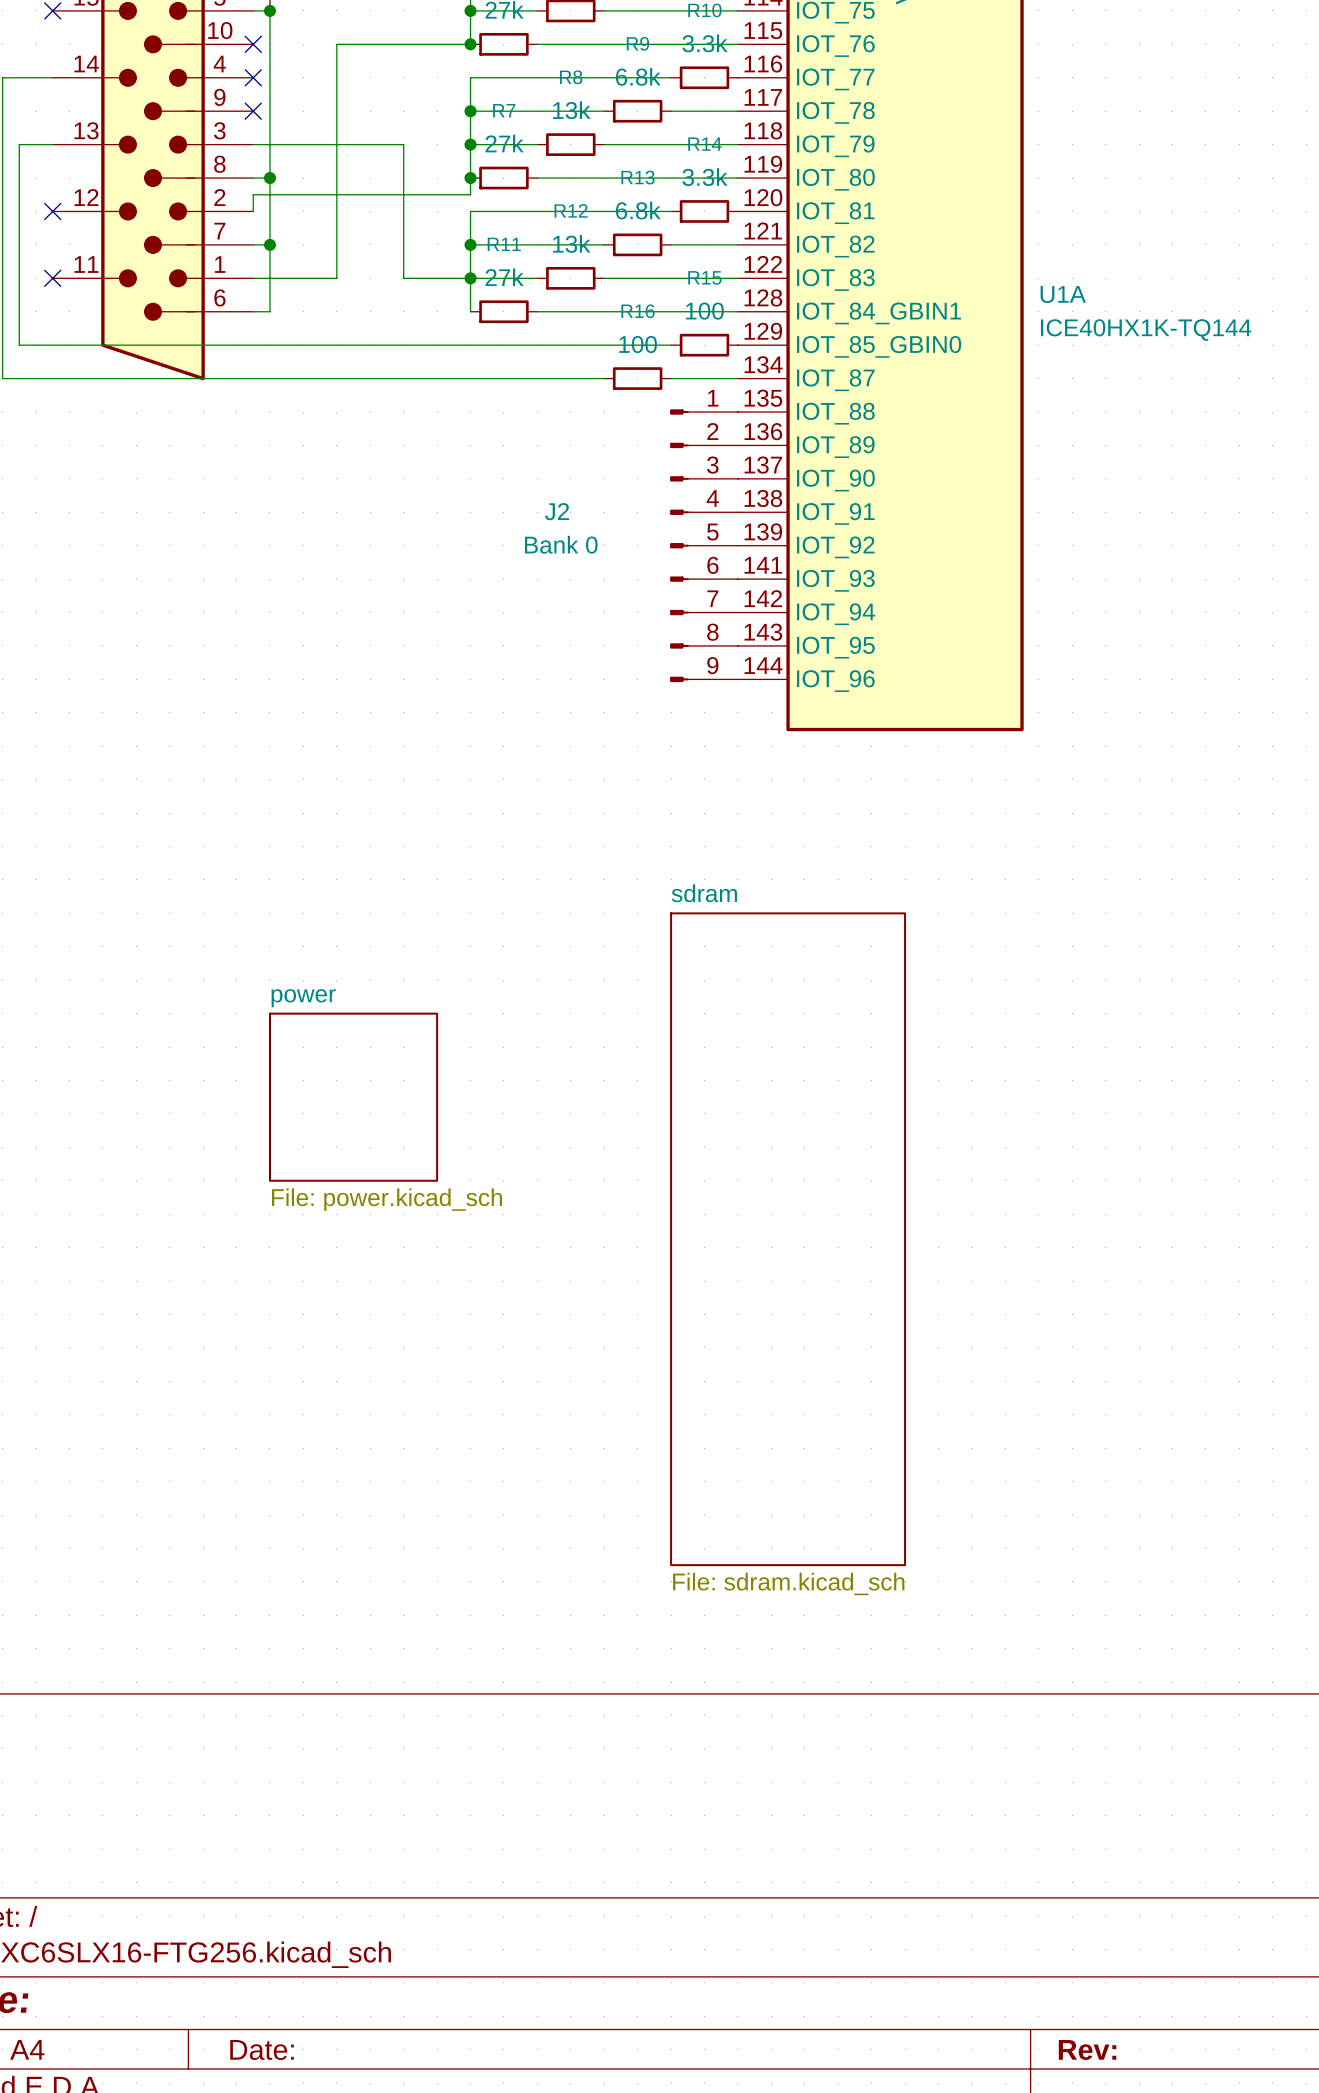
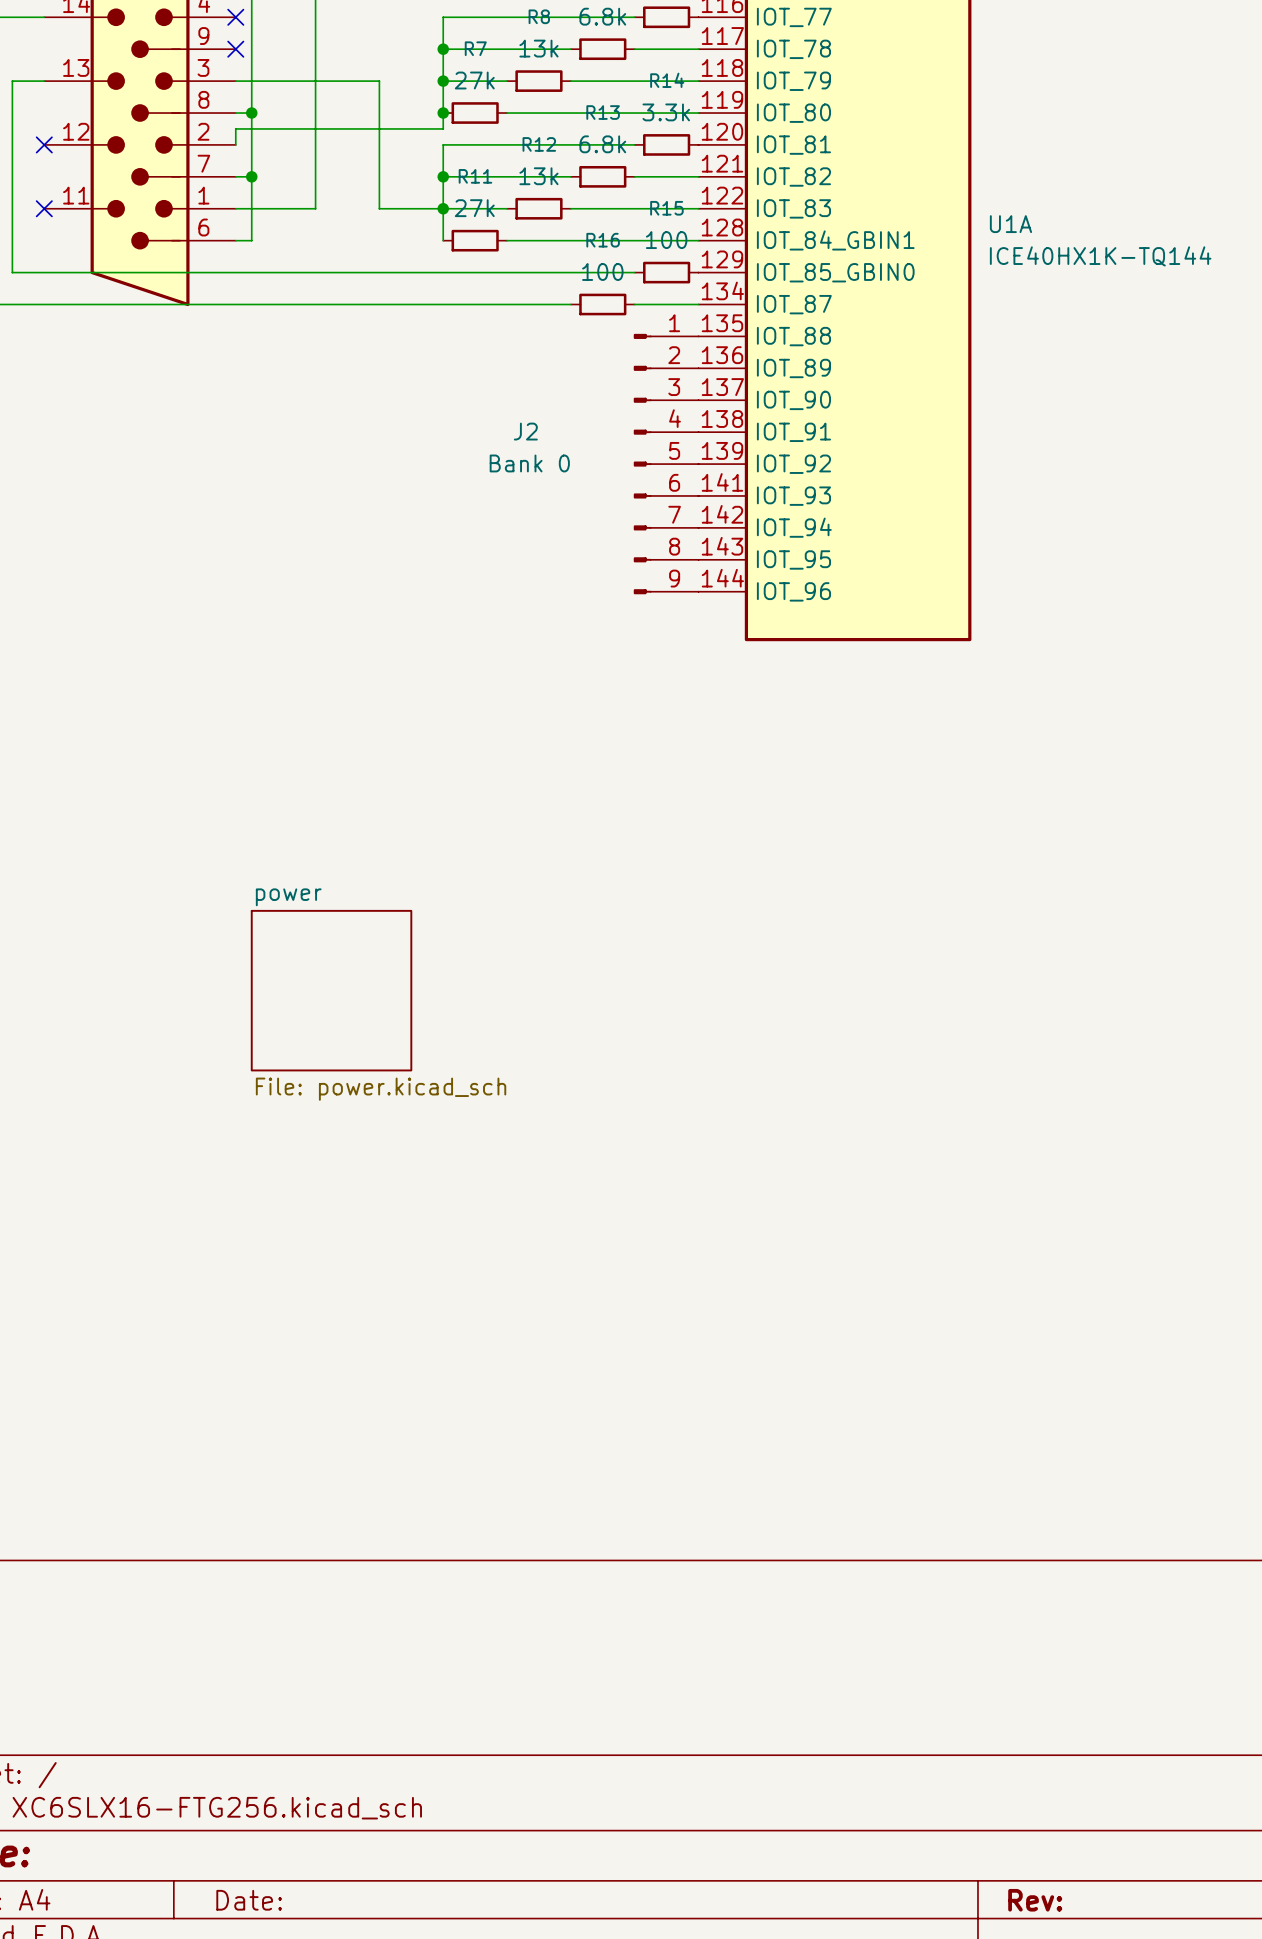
sheet sdram: File: sdram.kicad_sch (788, 1239) -> none

